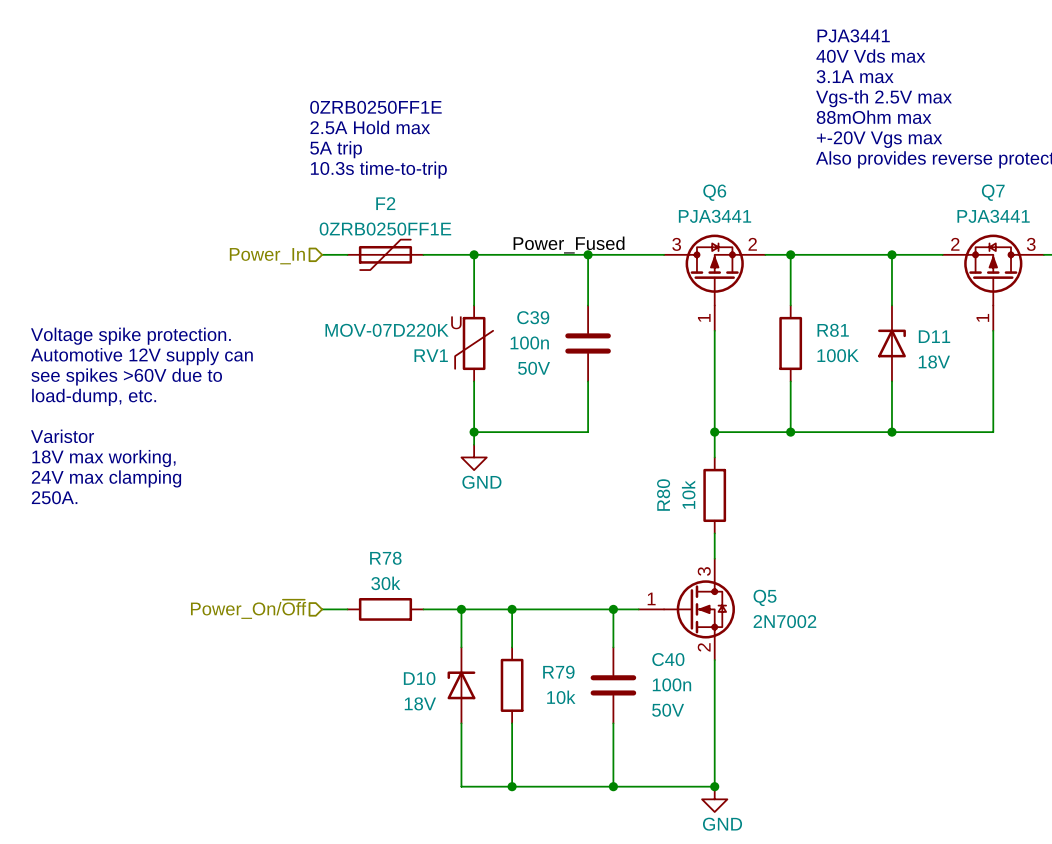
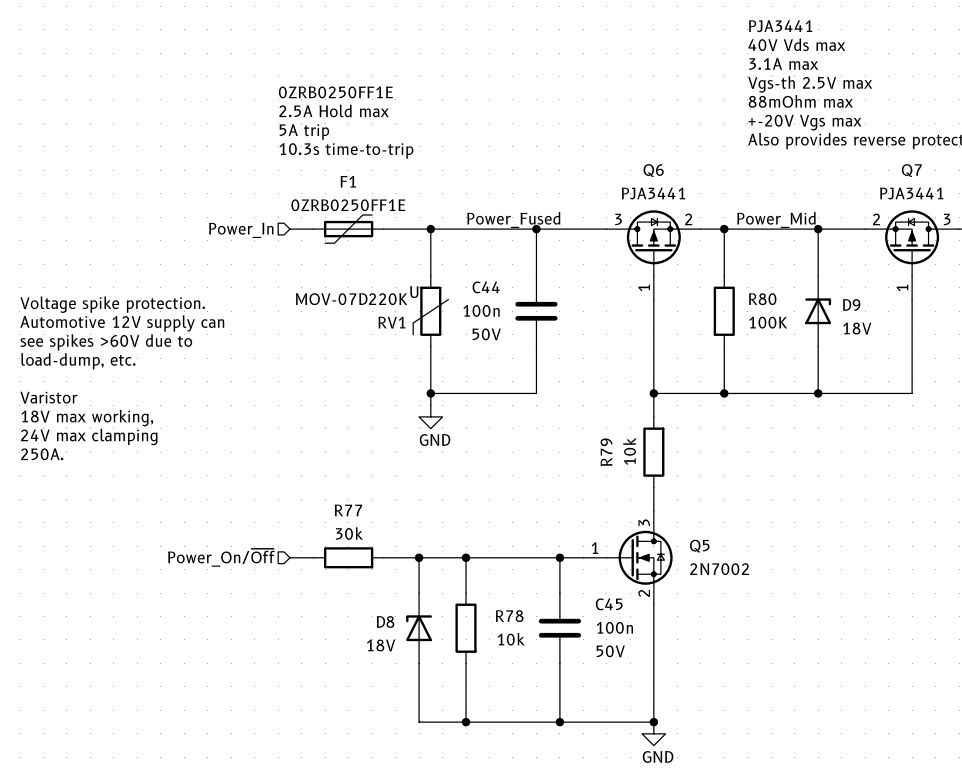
F2 name: F2 (385, 203) -> F1 (348, 181)
label: none -> Power_Mid (776, 219)
C39 name: C39 (533, 317) -> C44 (486, 287)
R81 name: R81 (833, 330) -> R80 (762, 299)
D11 name: D11 (934, 336) -> D9 (851, 305)
R80 name: R80 (663, 495) -> R79 (606, 452)
R78 name: R78 (385, 558) -> R77 (348, 510)
C40 name: C40 (668, 659) -> C45 (609, 604)
R79 name: R79 (558, 672) -> R78 (509, 616)
D10 name: D10 (419, 678) -> D8 (385, 621)

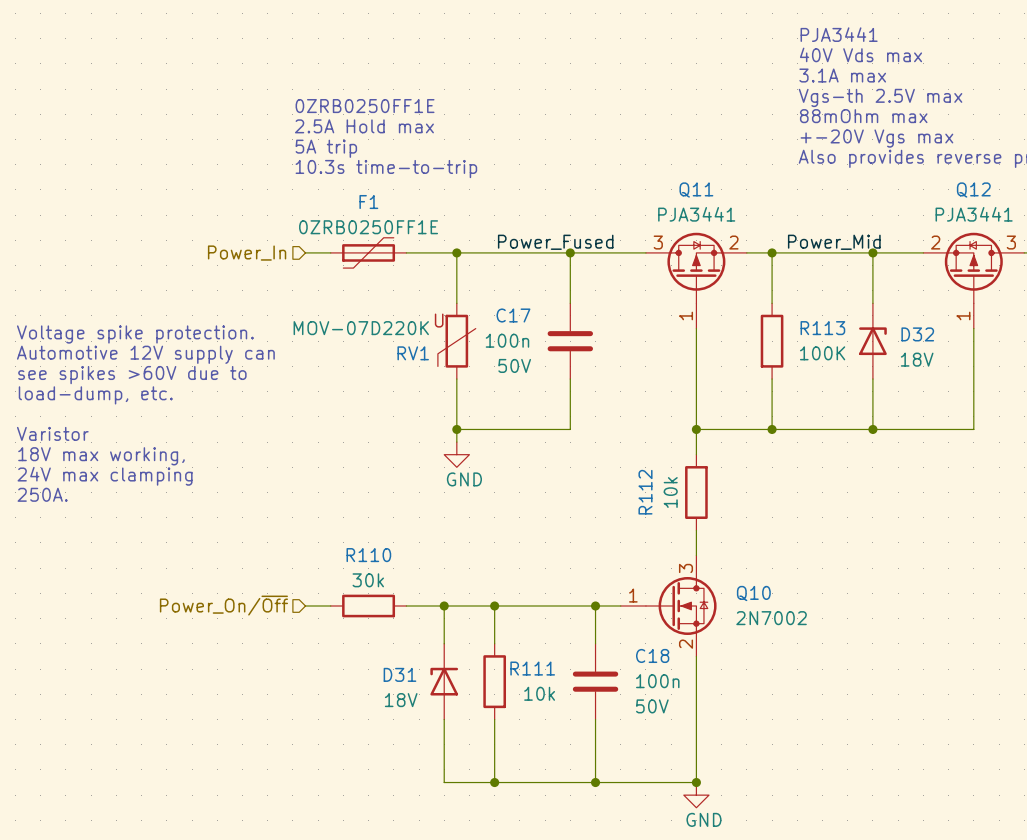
Q6 name: Q6 (653, 170) -> Q11 (696, 190)
Q7 name: Q7 (911, 170) -> Q12 (973, 190)
C44 name: C44 (486, 287) -> C17 (513, 315)
R80 name: R80 (762, 299) -> R113 (822, 328)
D9 name: D9 (851, 305) -> D32 (917, 334)
R79 name: R79 (606, 452) -> R112 (645, 492)
R77 name: R77 (348, 510) -> R110 (368, 555)
Q5 name: Q5 (699, 546) -> Q10 (753, 593)
C45 name: C45 (609, 604) -> C18 (652, 655)
R78 name: R78 (509, 616) -> R111 (532, 668)
D8 name: D8 (385, 621) -> D31 (399, 674)

